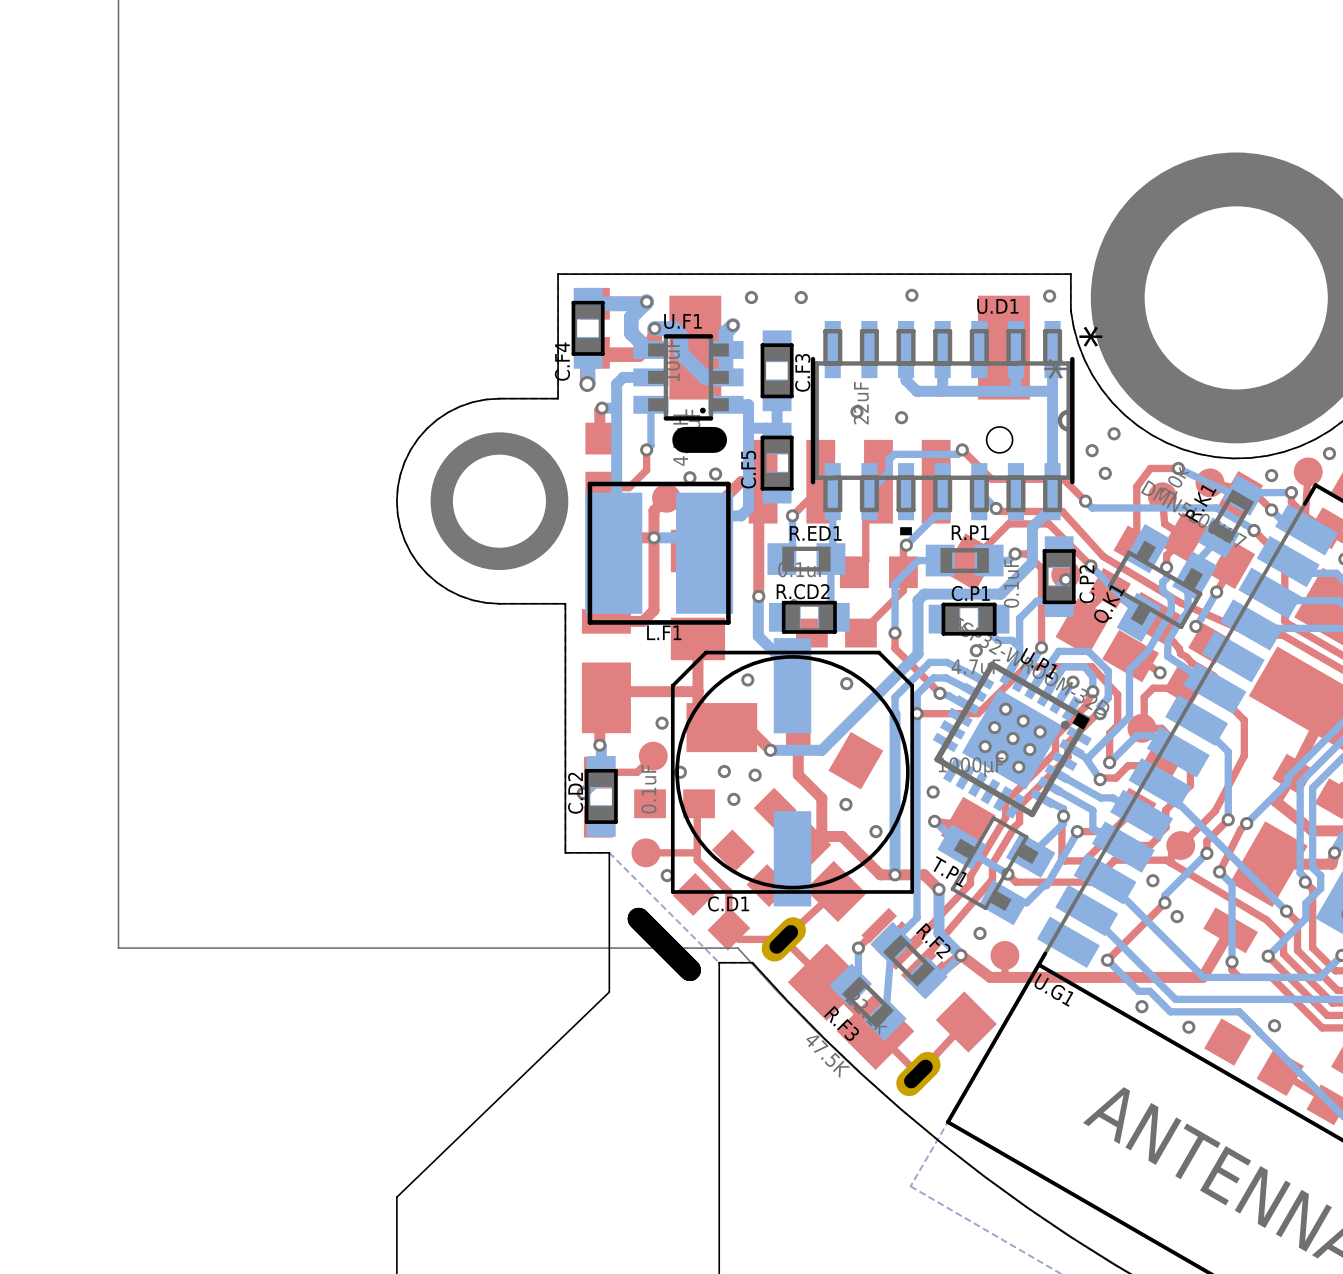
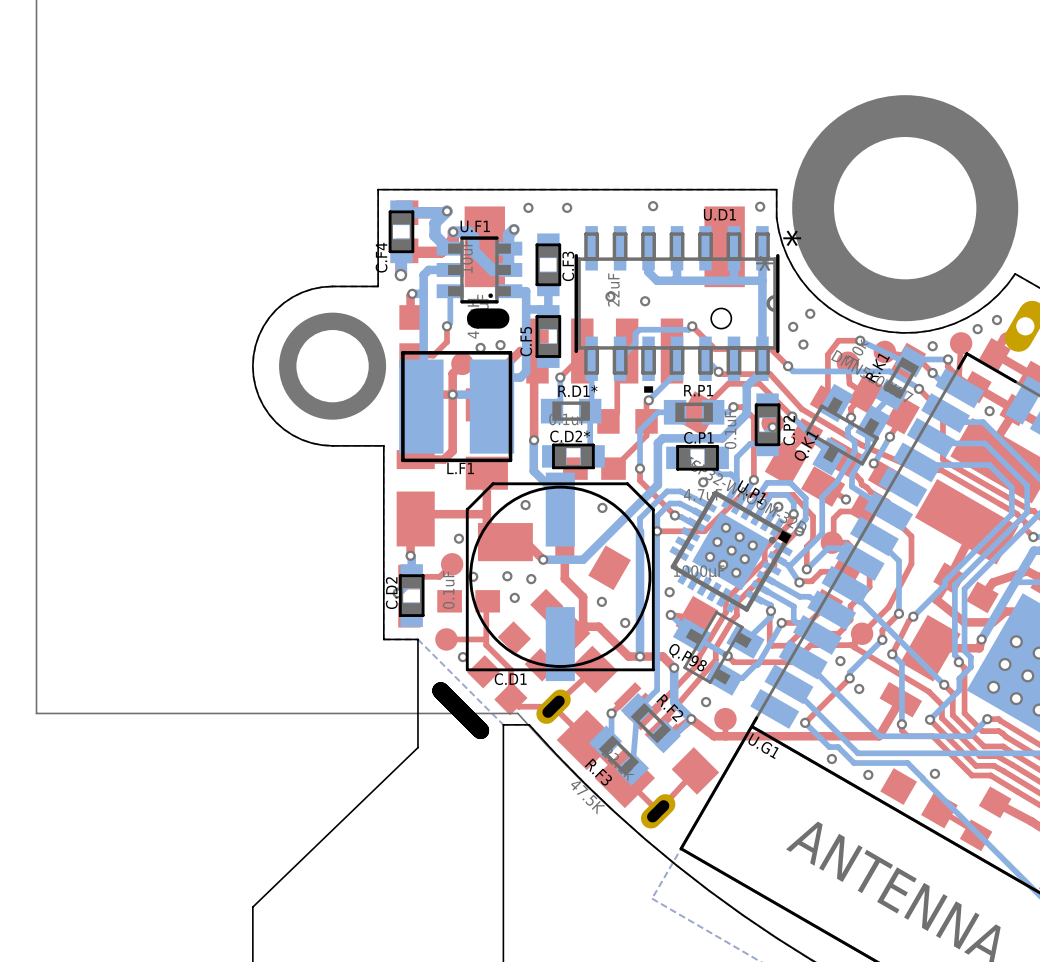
R.ED1 name: R.ED1 (815, 533) -> R.D1* (577, 391)
R.CD2 name: R.CD2 (803, 591) -> C.D2* (570, 436)
T.P1 name: T.P1 (950, 871) -> Q.P98 (688, 657)

